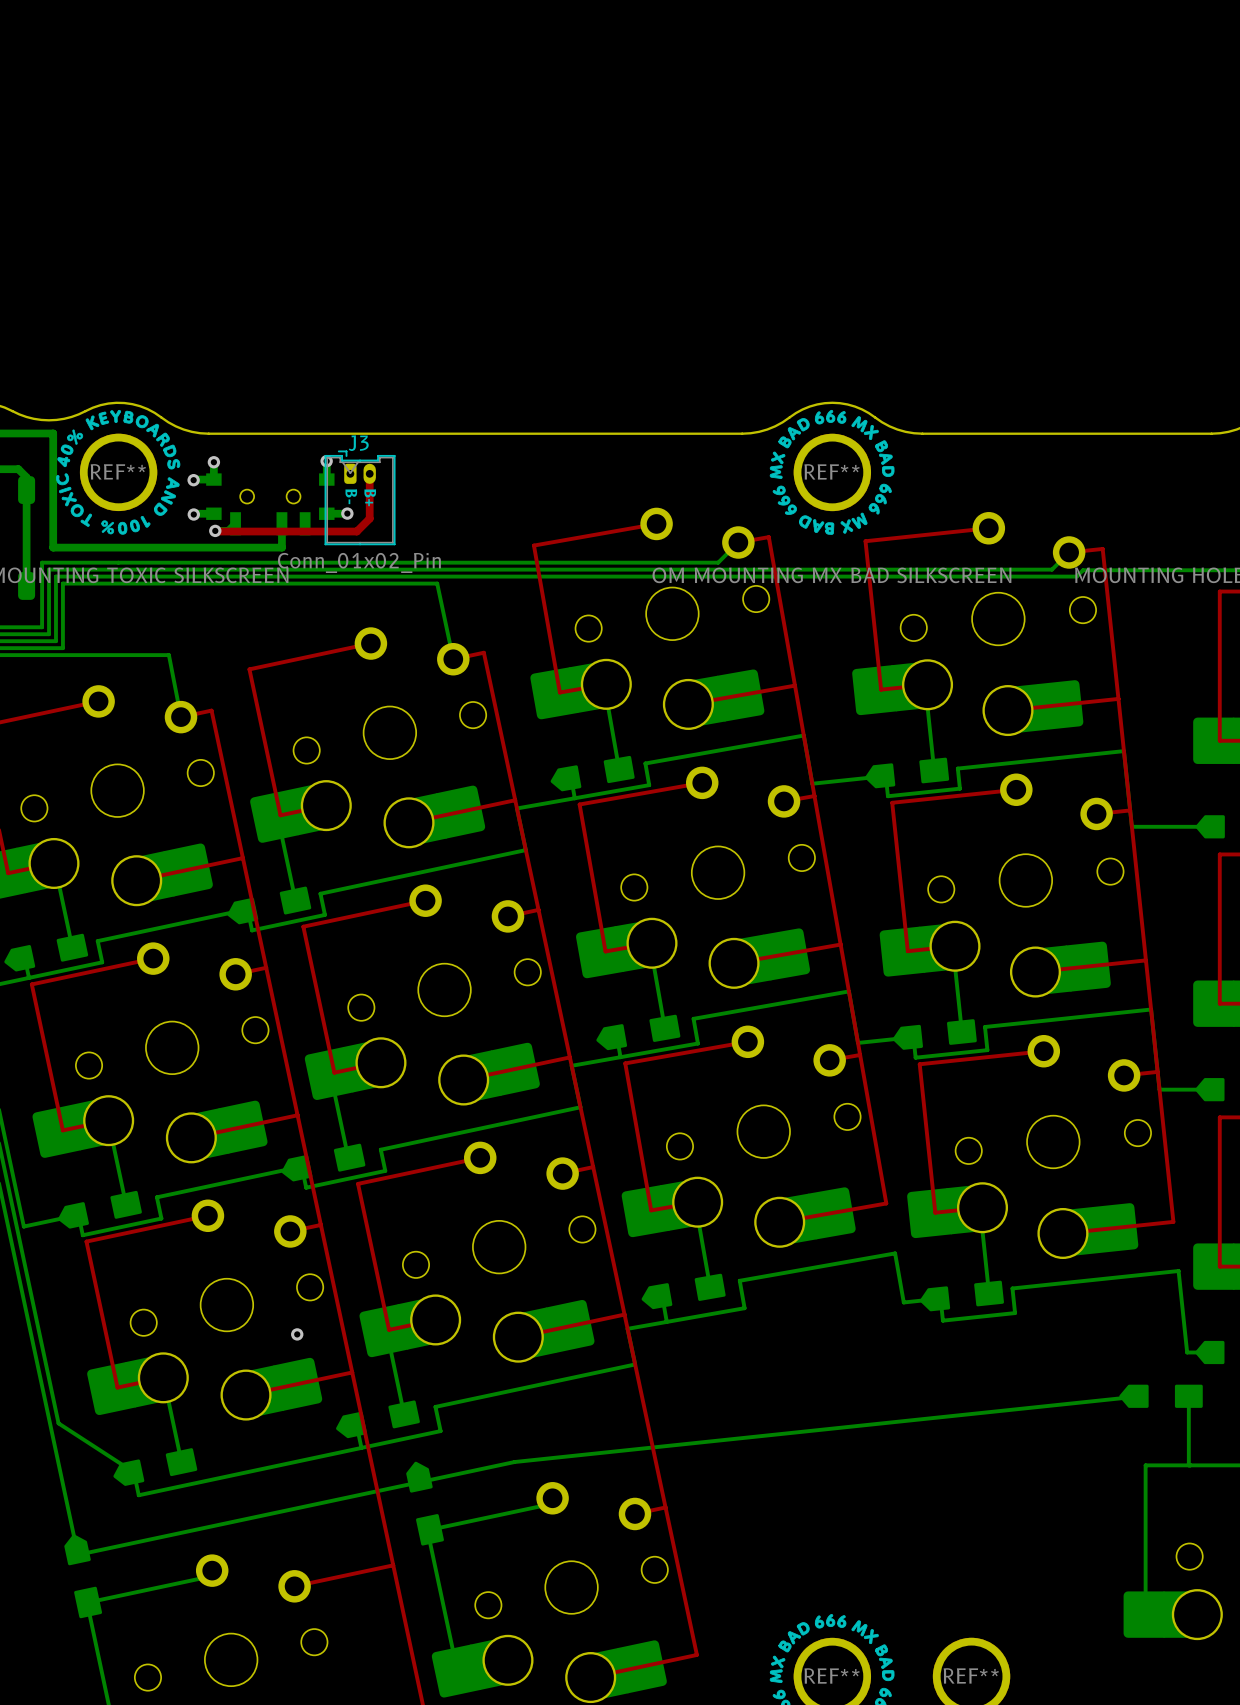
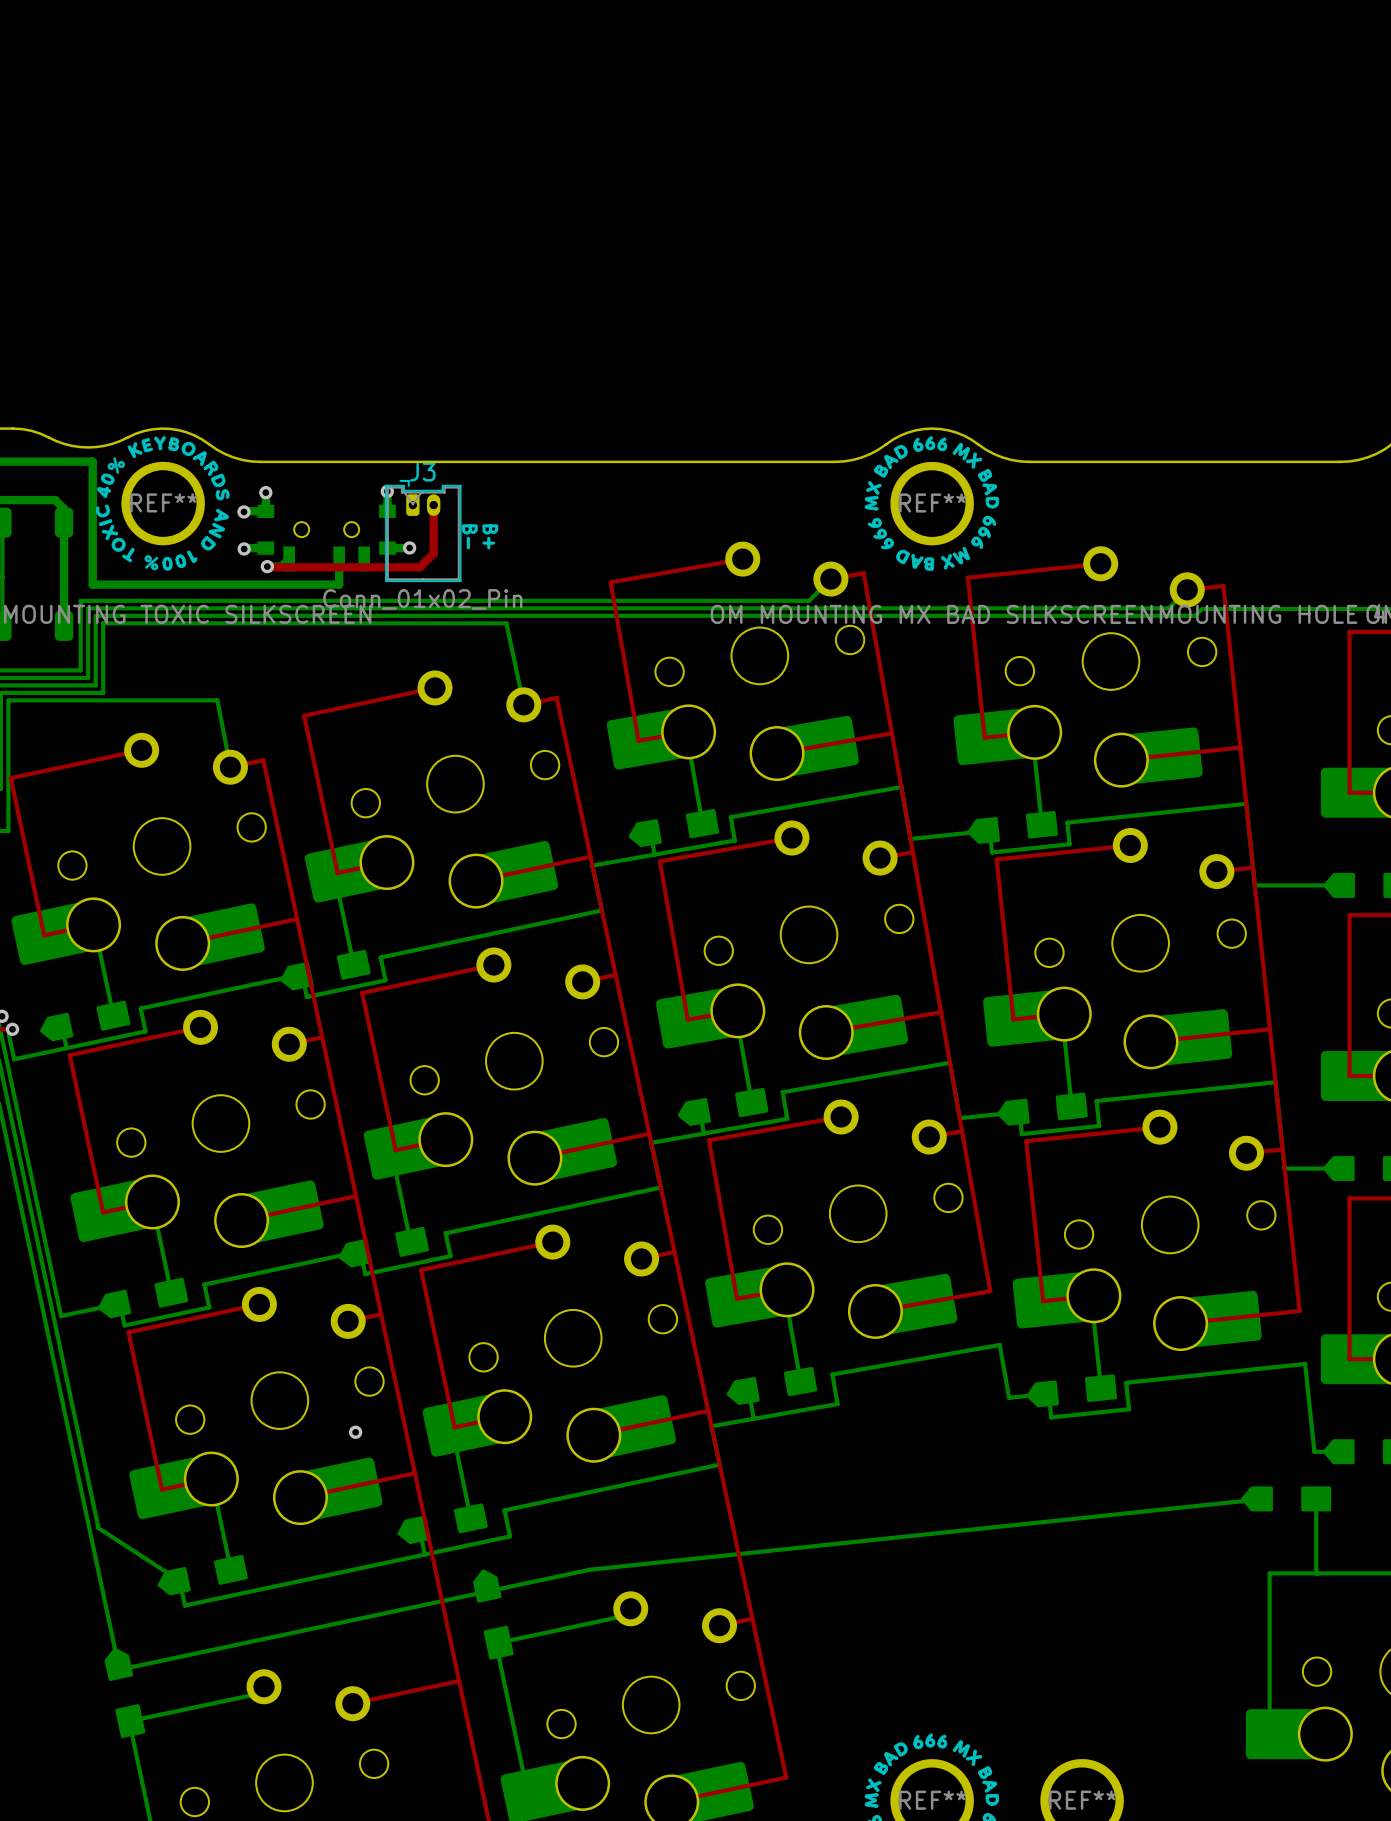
text position: B- (351, 496) -> B- (469, 536)
text position: B+ (370, 497) -> B+ (490, 536)

